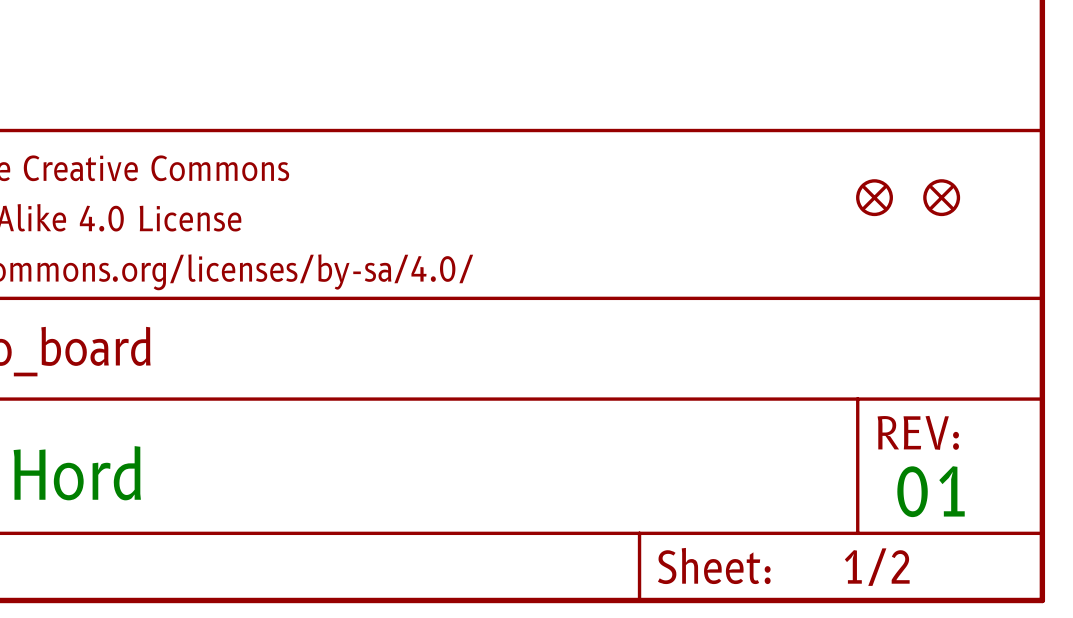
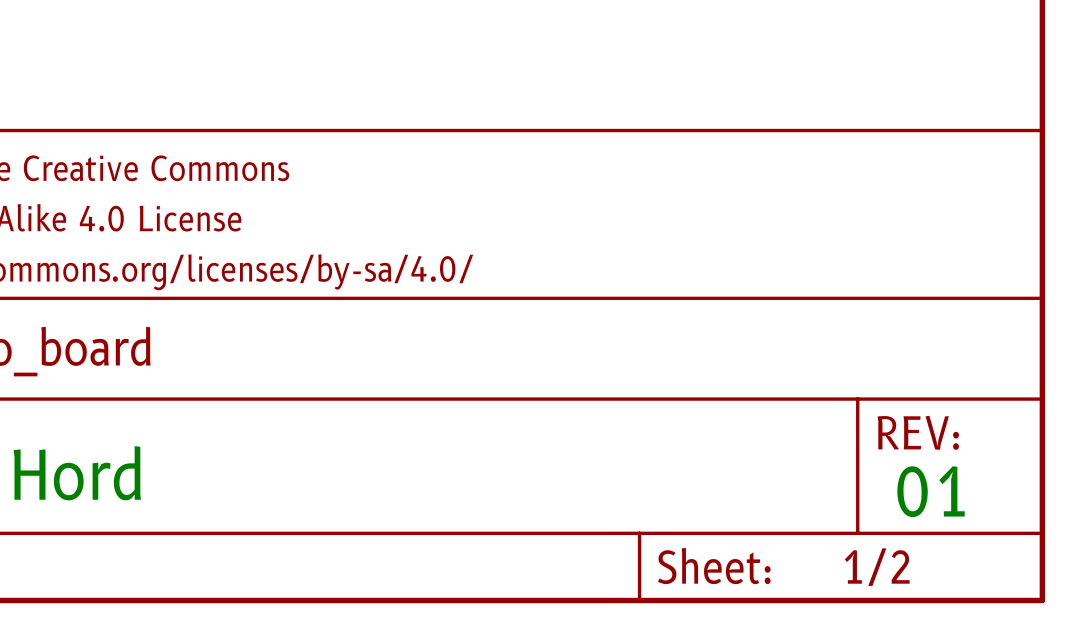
part: (874, 197) -> none
part: (941, 197) -> none

